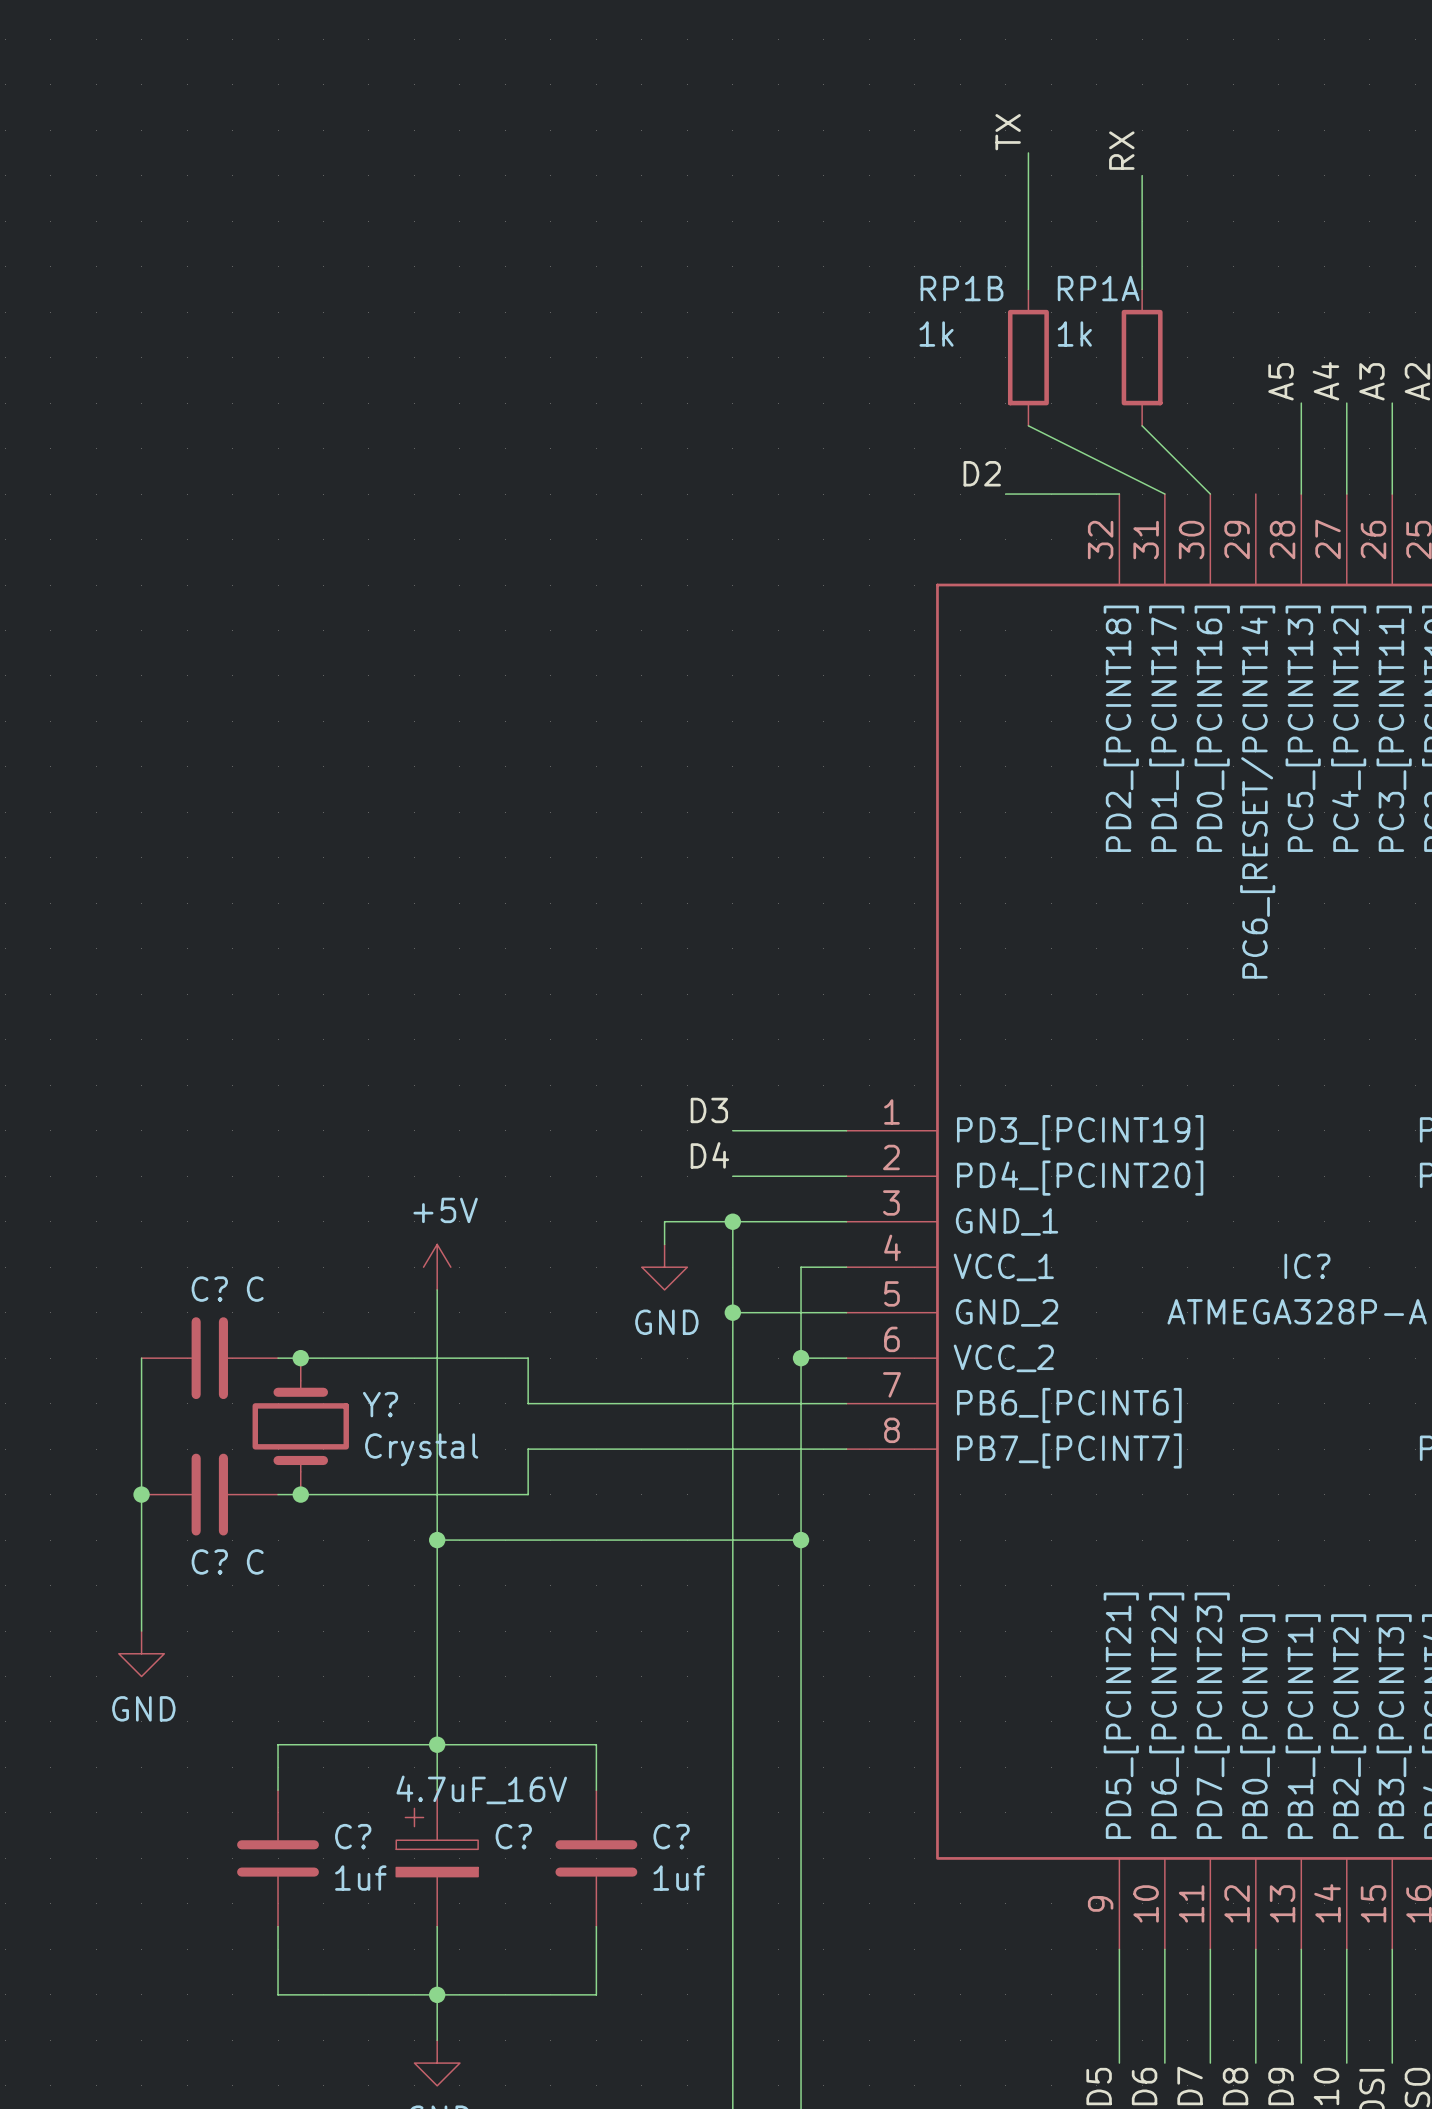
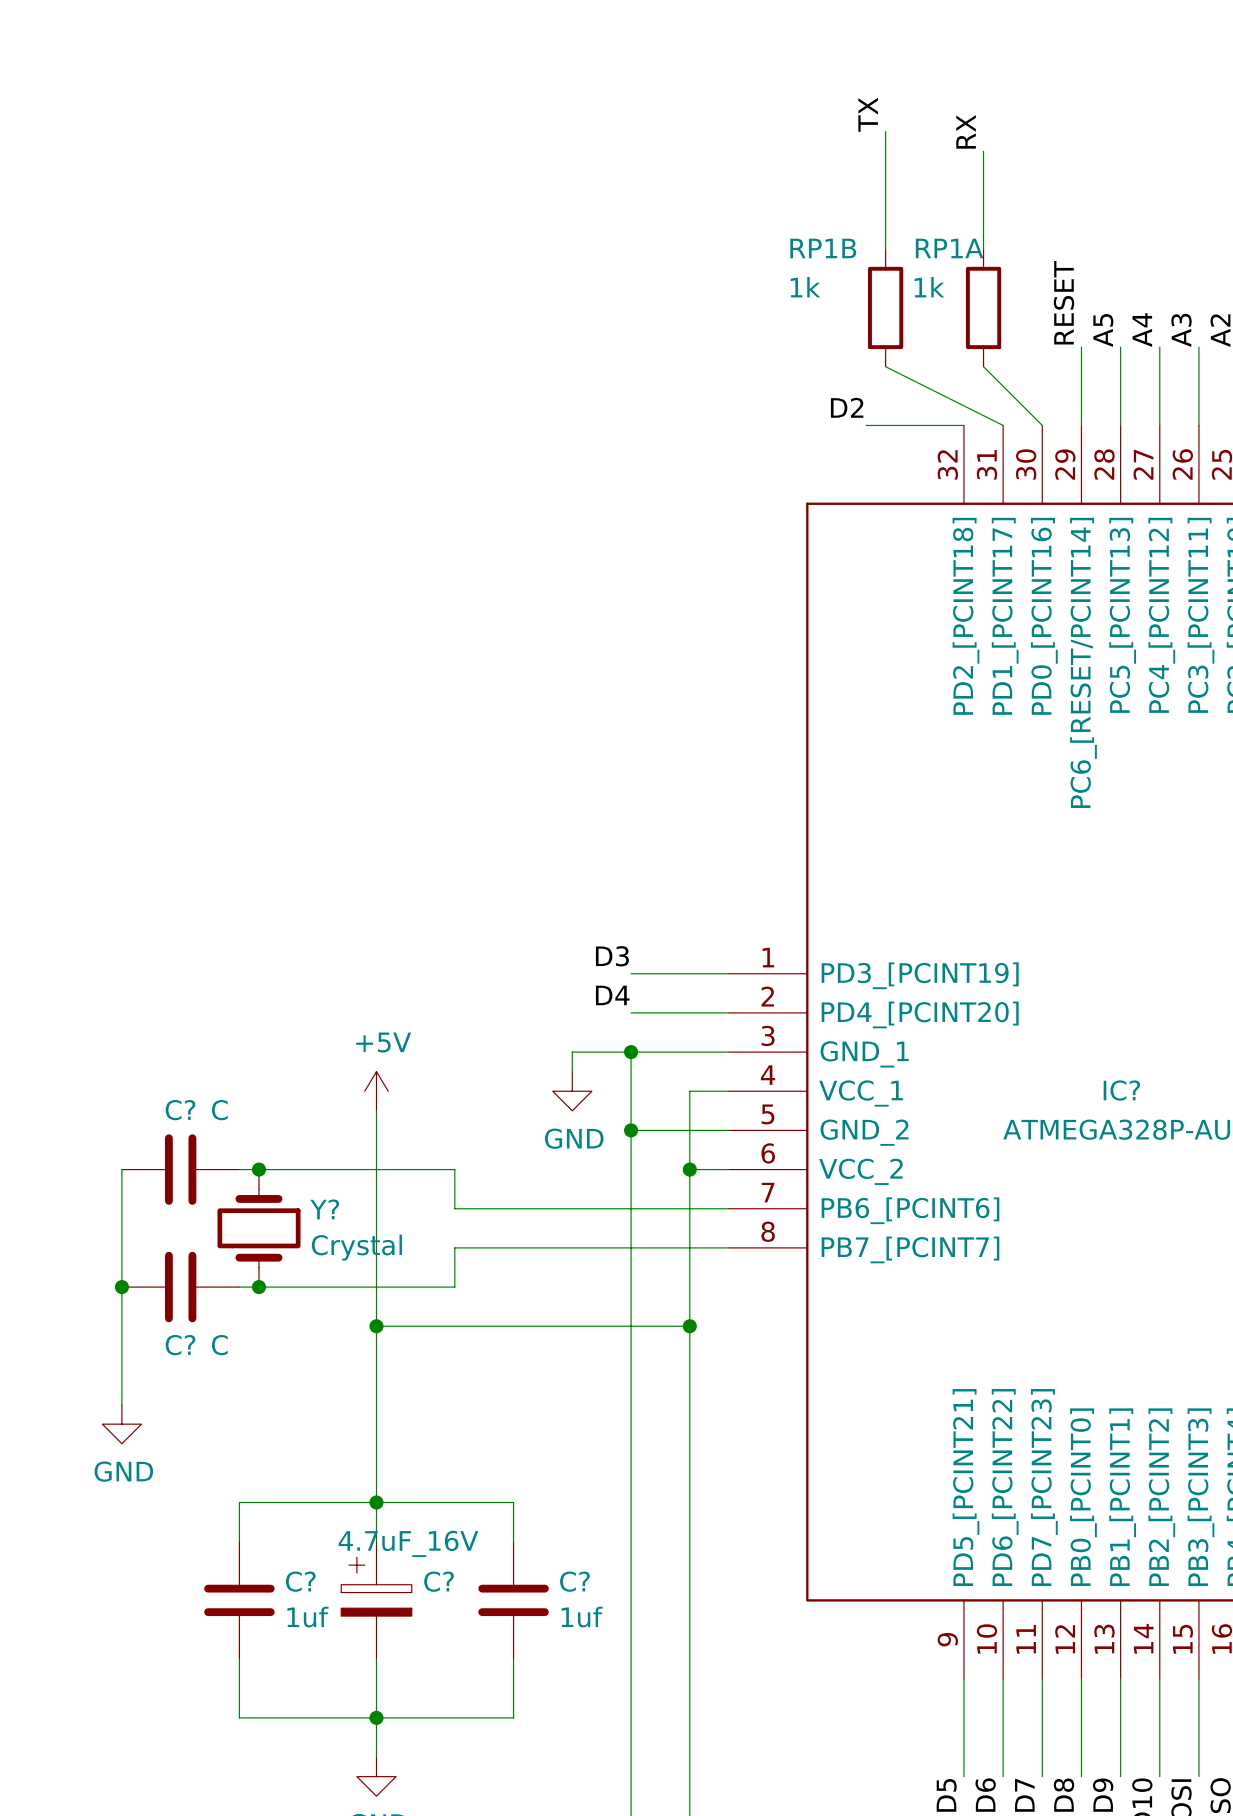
label: none -> RESET (1064, 302)
wire: none -> (1081, 347) (1081, 425)

